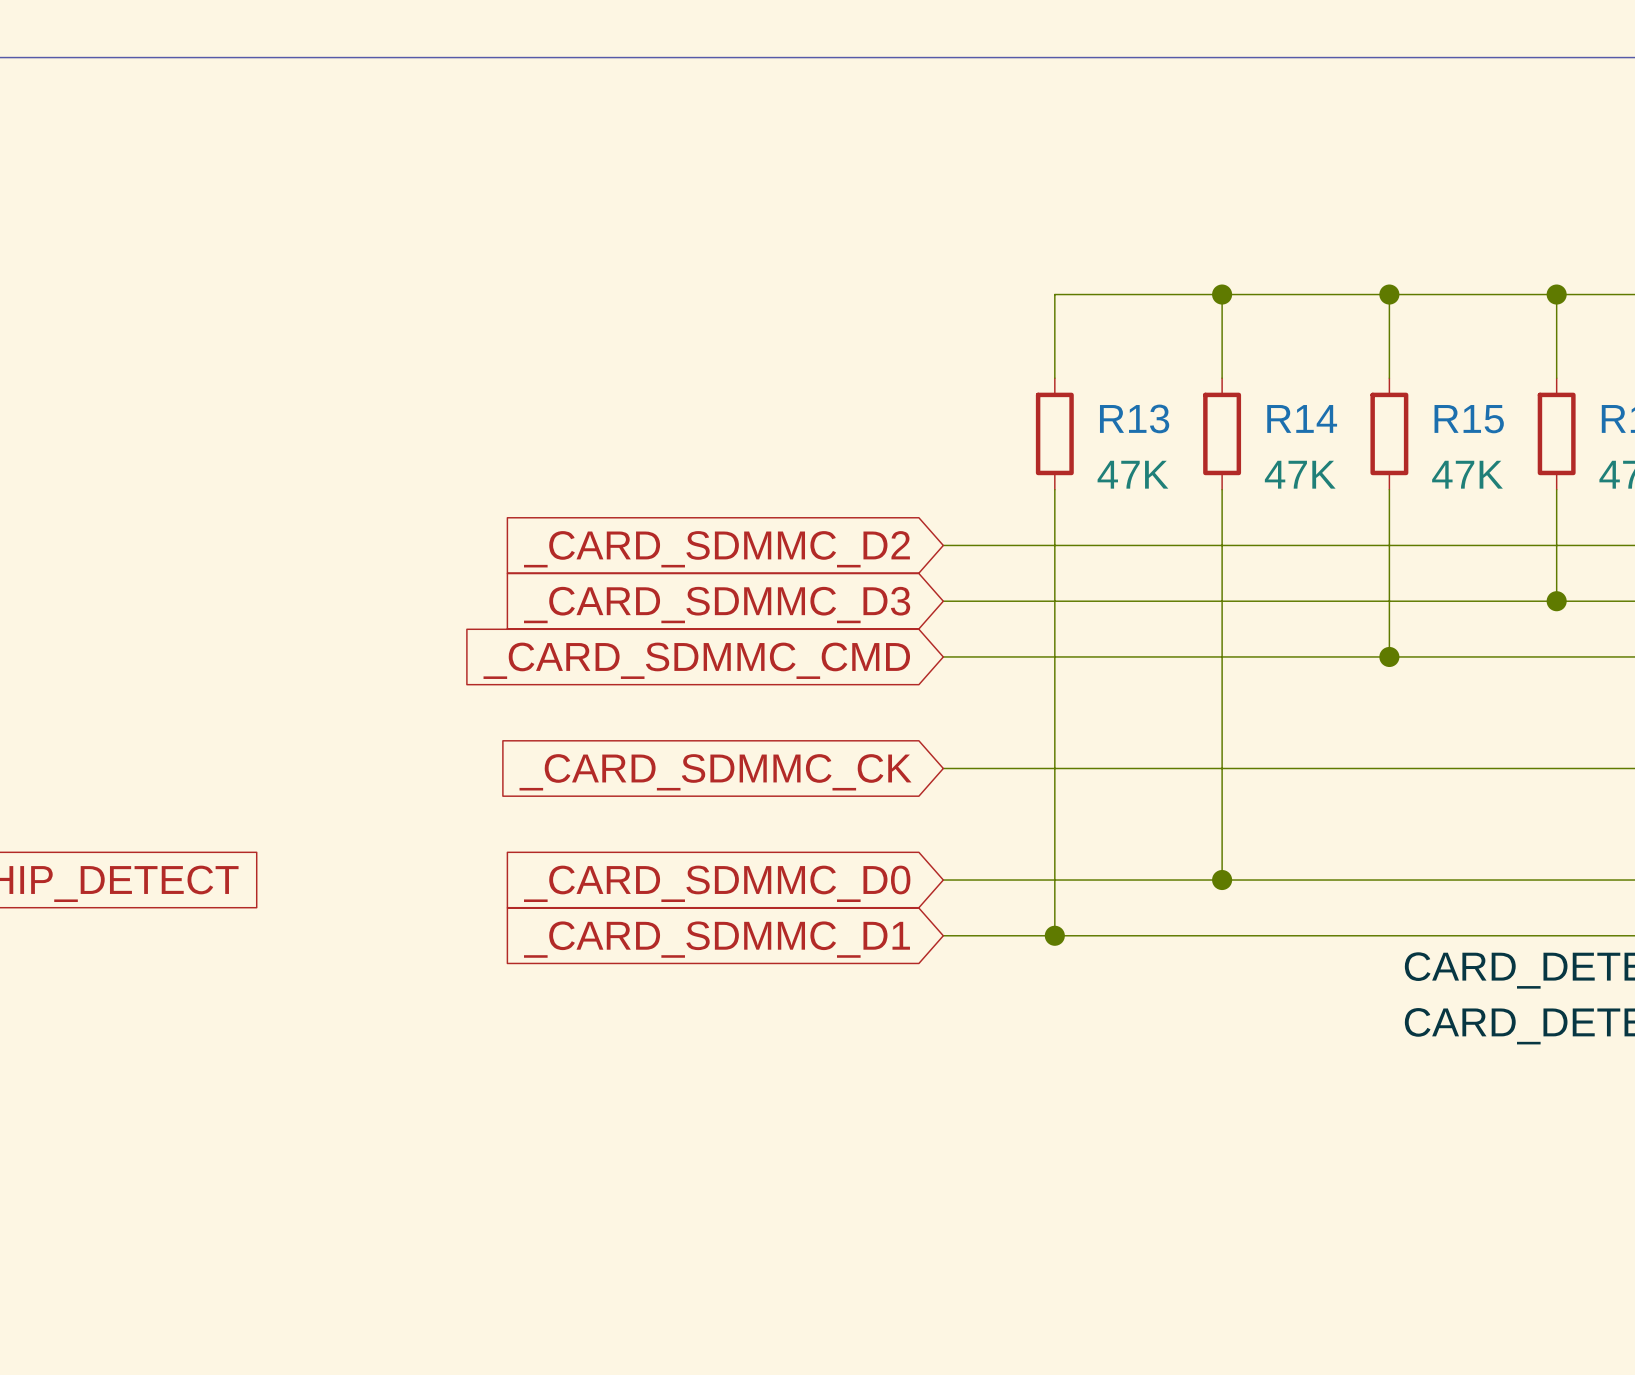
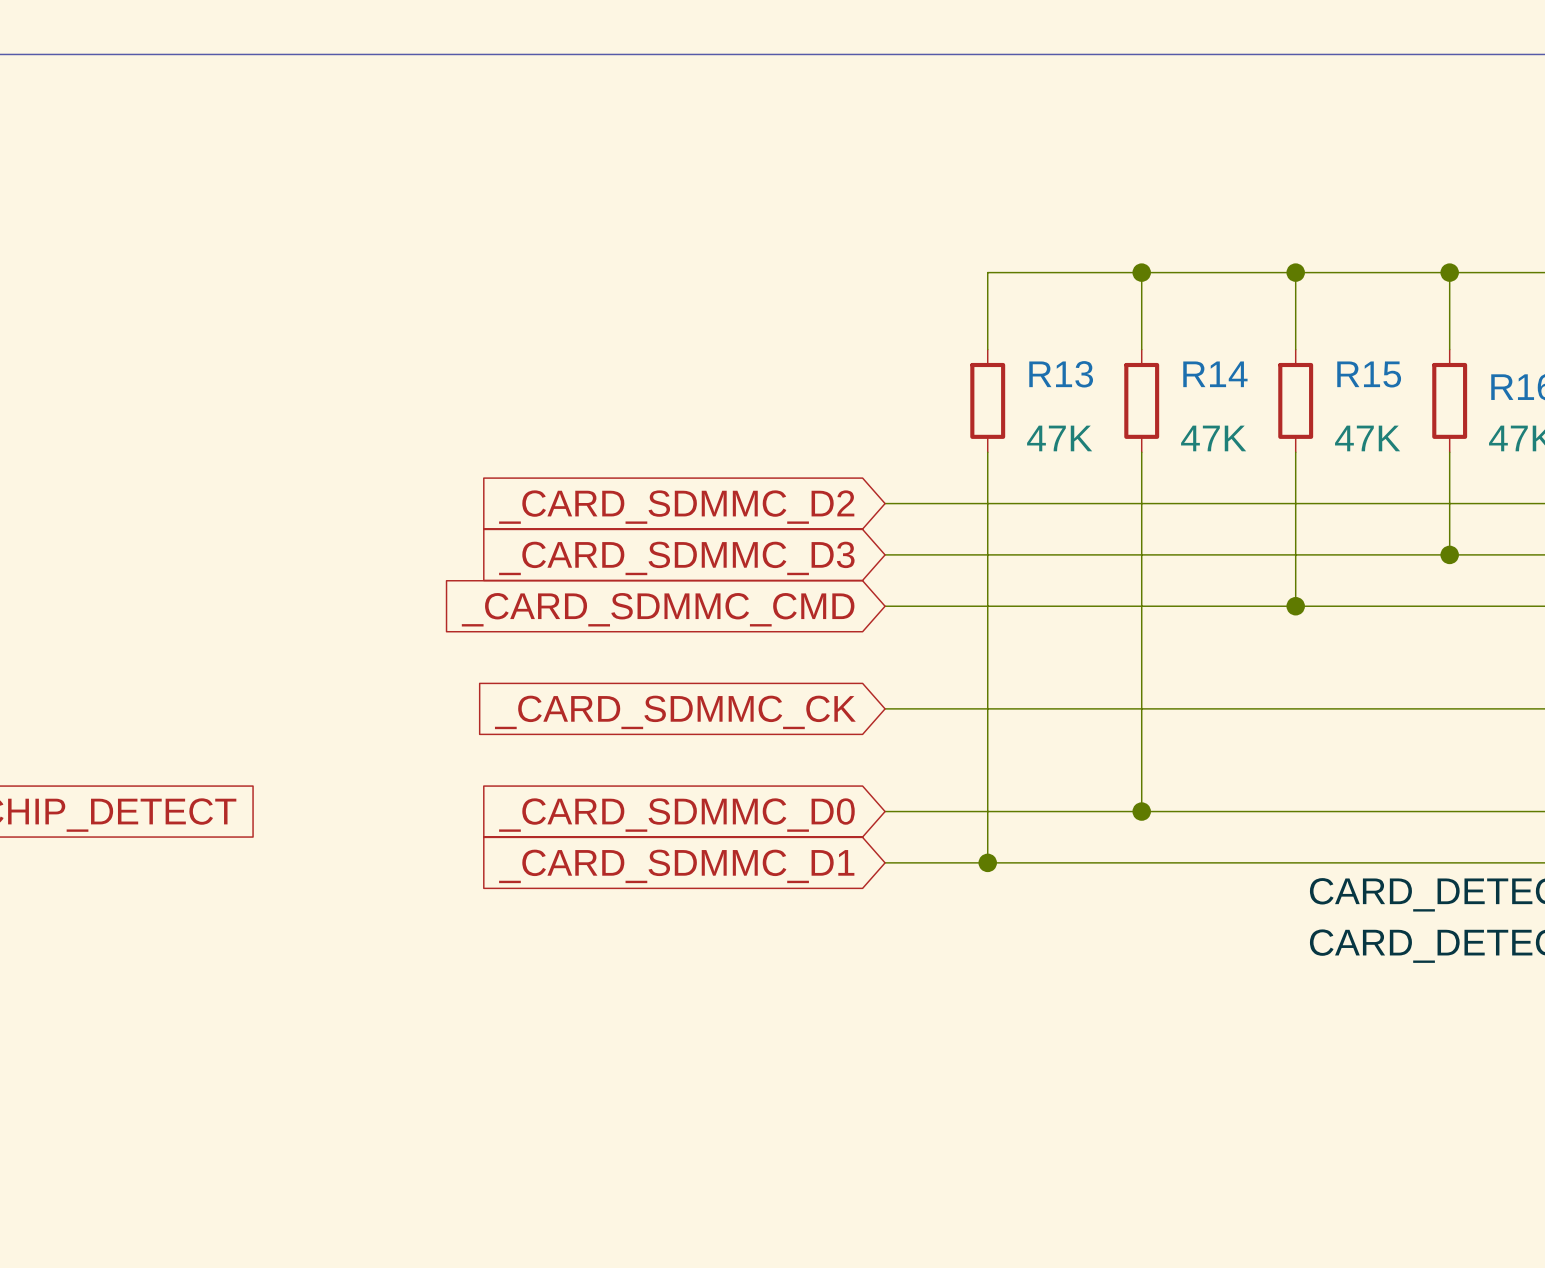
R13 name position: R13 (1134, 418) -> R13 (1061, 374)
R14 name position: R14 (1302, 418) -> R14 (1215, 374)
R15 name position: R15 (1469, 419) -> R15 (1369, 374)

